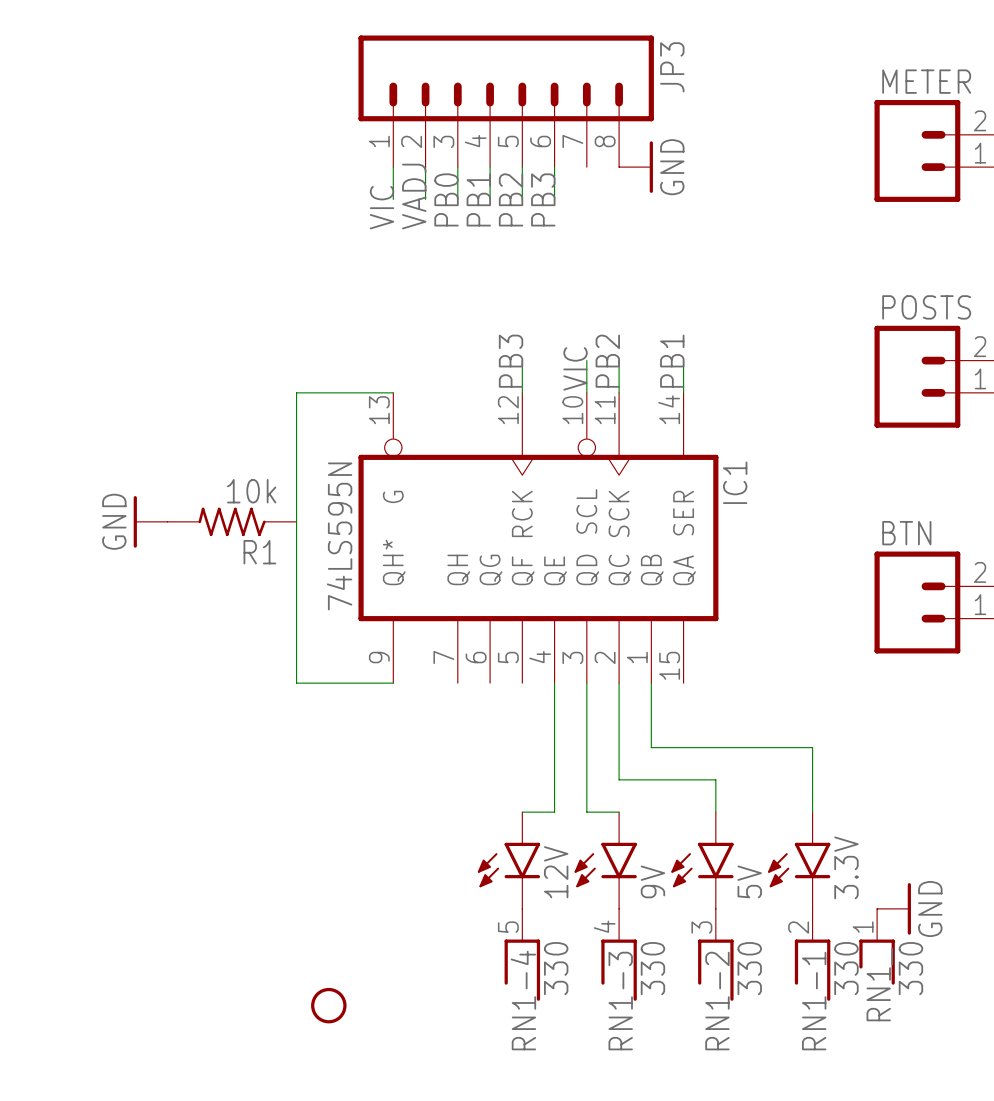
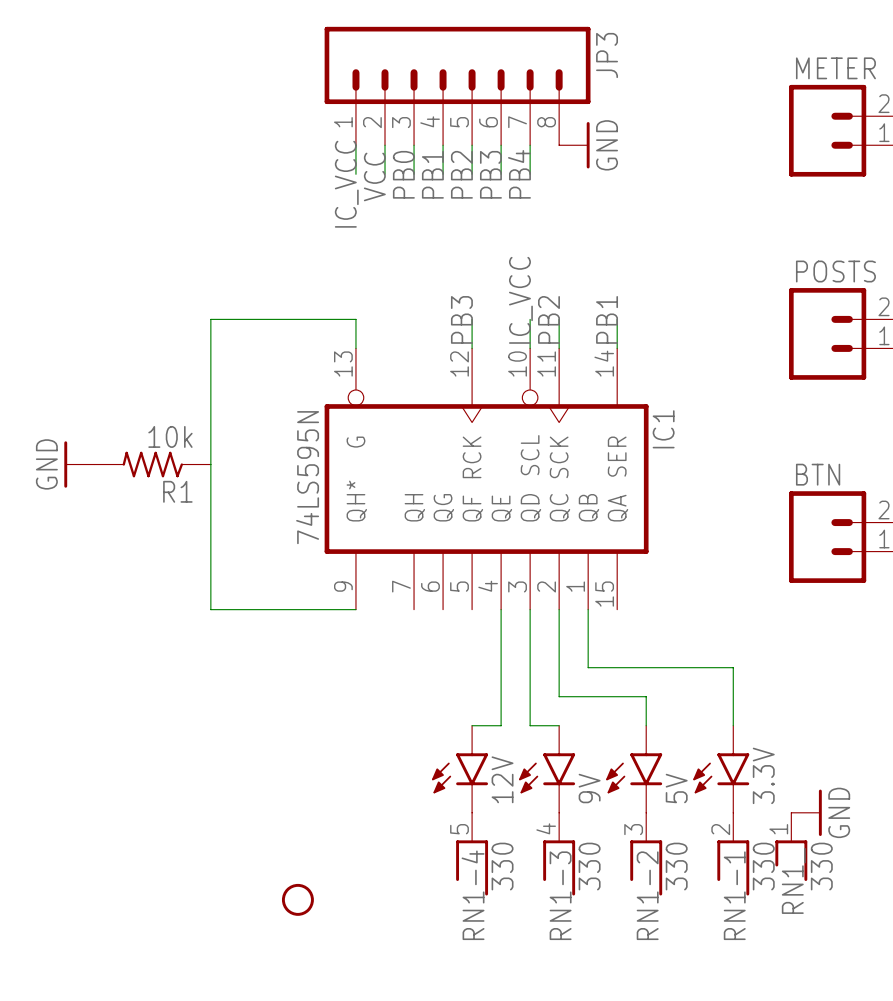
wire: none -> (530, 145) (530, 174)
label: VADJ (414, 196) -> VCC (374, 176)
label: none -> PB4 (519, 174)
label: VIC (382, 207) -> none
label: none -> IC_VCC (346, 184)
label: VIC (575, 368) -> IC_VCC (520, 300)
wire: (393, 392) (296, 392) (296, 683) -> (355, 348) (355, 319) (210, 319) (210, 609) (268, 609)
power symbol position: GND (150, 521) -> GND (79, 464)
R1 position: (232, 521) -> (152, 464)

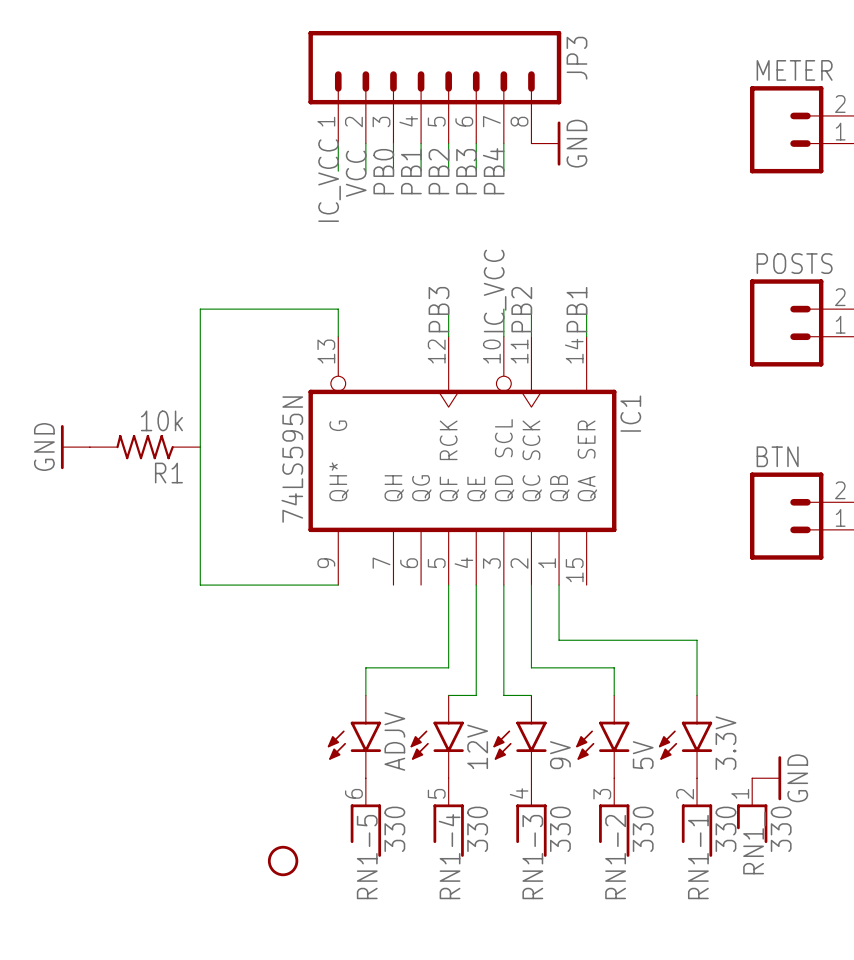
wire: none -> (448, 585) (448, 667) (365, 667) (365, 695)
ADJV: none -> (354, 736)
RN1-5: none -> 330 (365, 817)

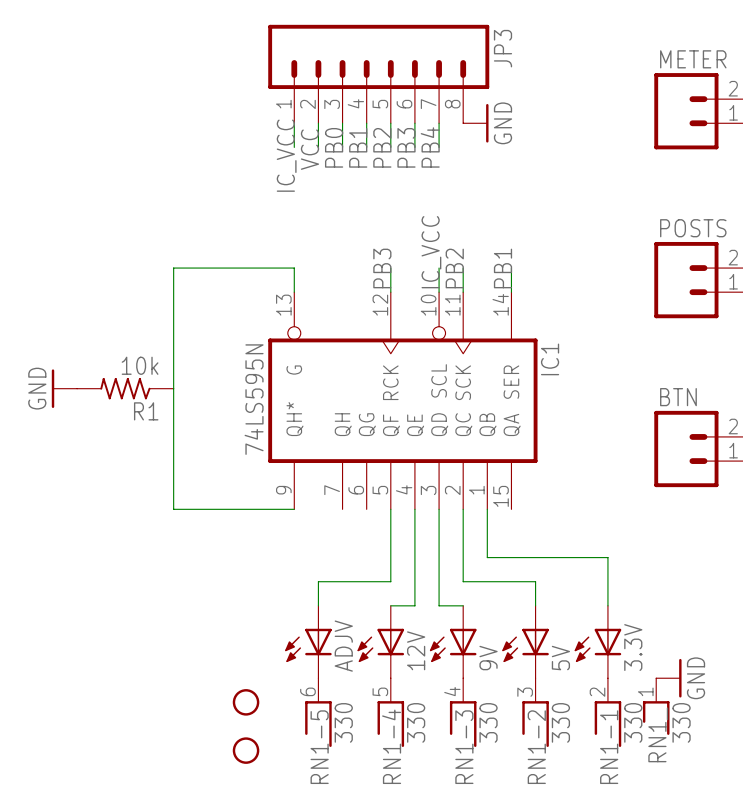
ADJV symbol: [327, 695, 382, 779] -> [285, 605, 332, 679]
12V symbol: [410, 695, 464, 779] -> [357, 605, 405, 679]
9V symbol: [493, 695, 547, 779] -> [429, 605, 477, 679]
5V symbol: [576, 695, 630, 779] -> [502, 605, 549, 679]
3.3V symbol: [658, 695, 713, 779] -> [574, 605, 622, 679]
part: none -> (246, 702)

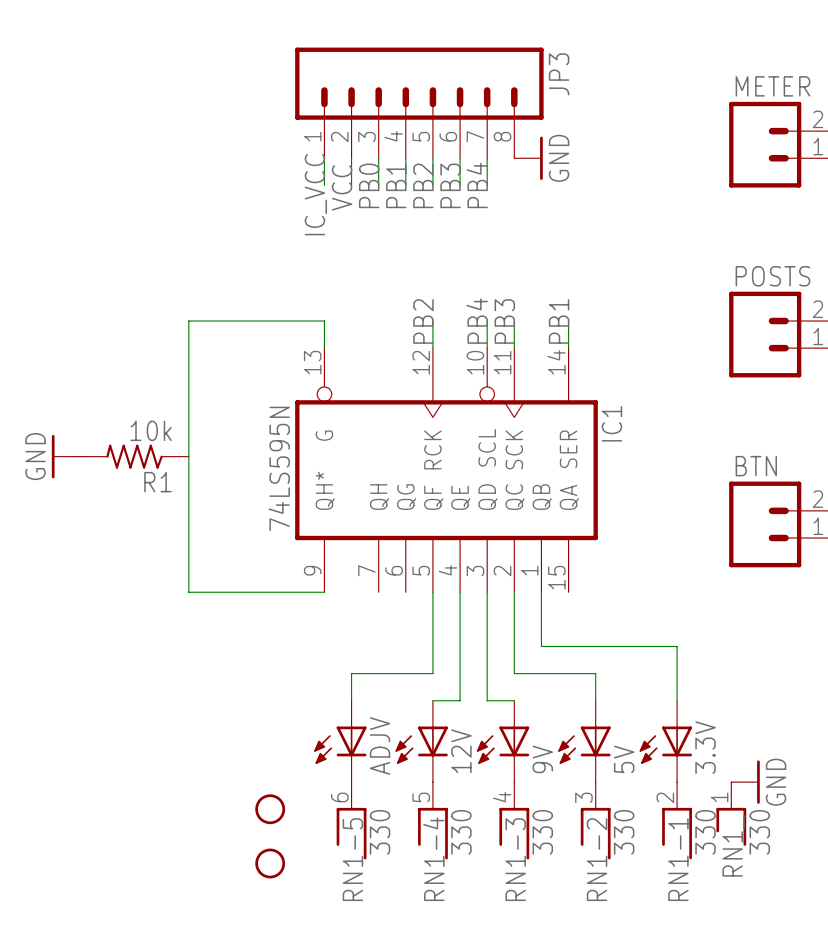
label: IC_VCC (431, 252) -> PB4 (477, 321)
label: PB3 (382, 268) -> PB2 (423, 321)
label: PB2 (454, 268) -> PB3 (504, 321)

